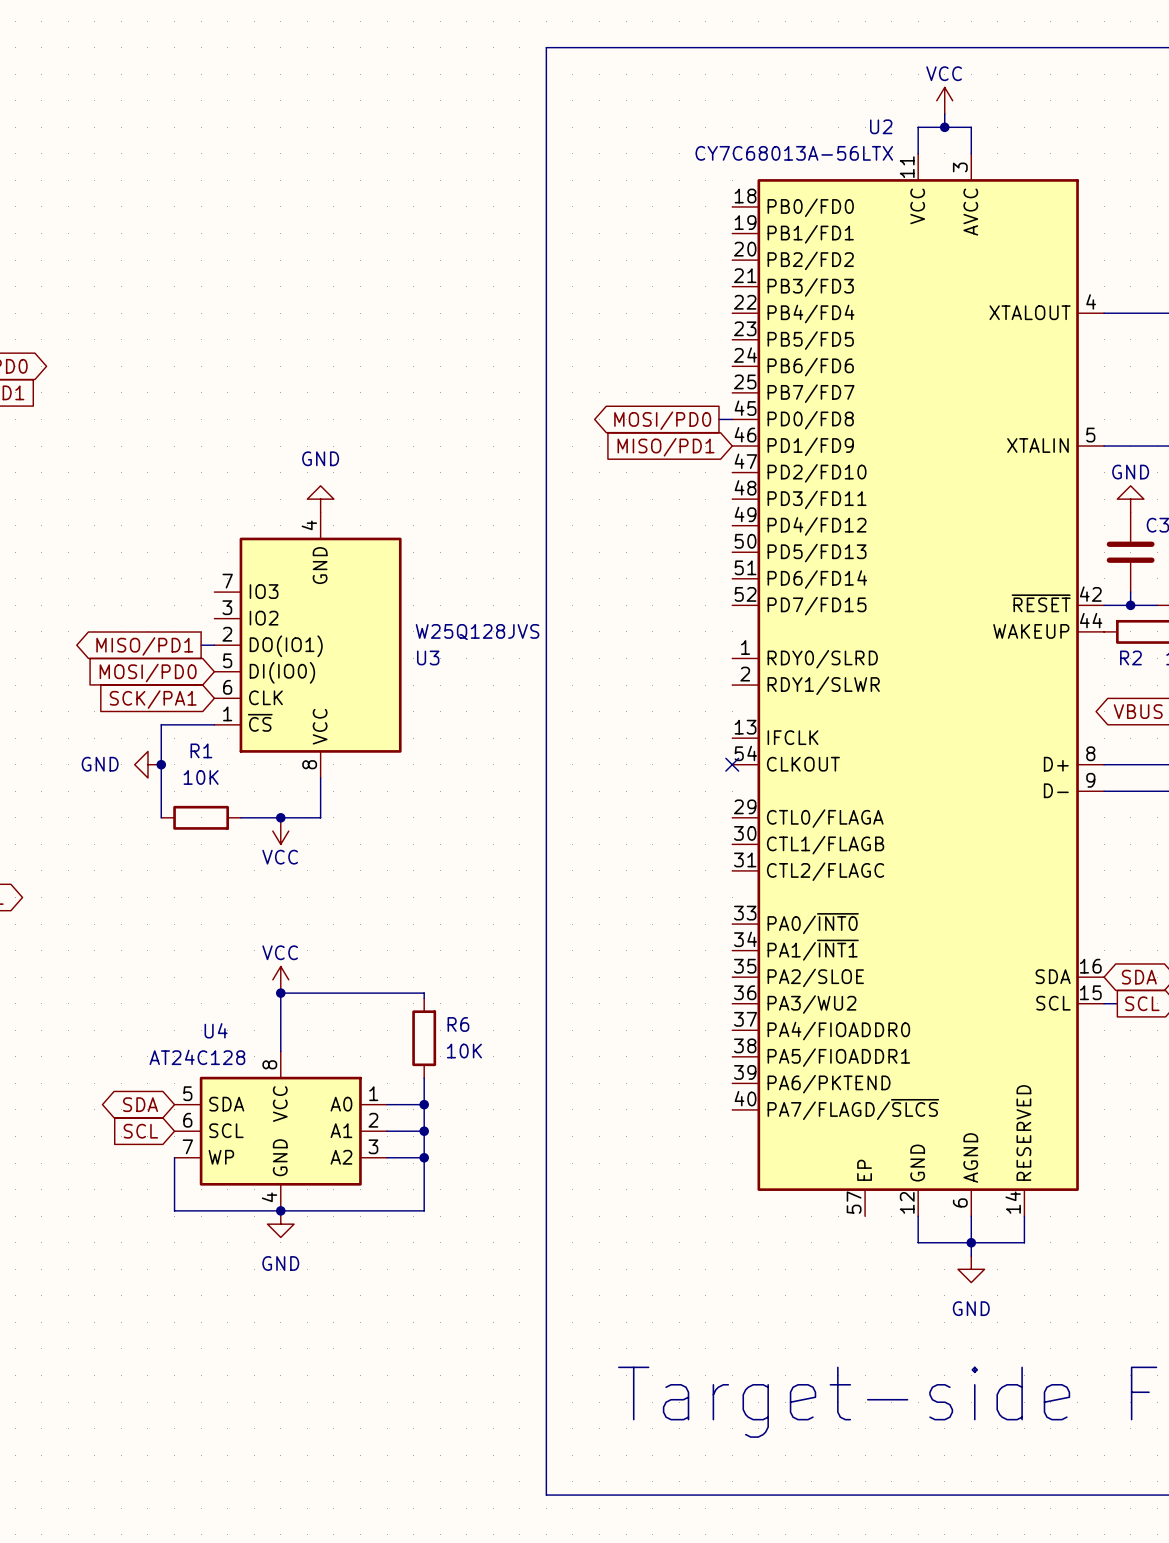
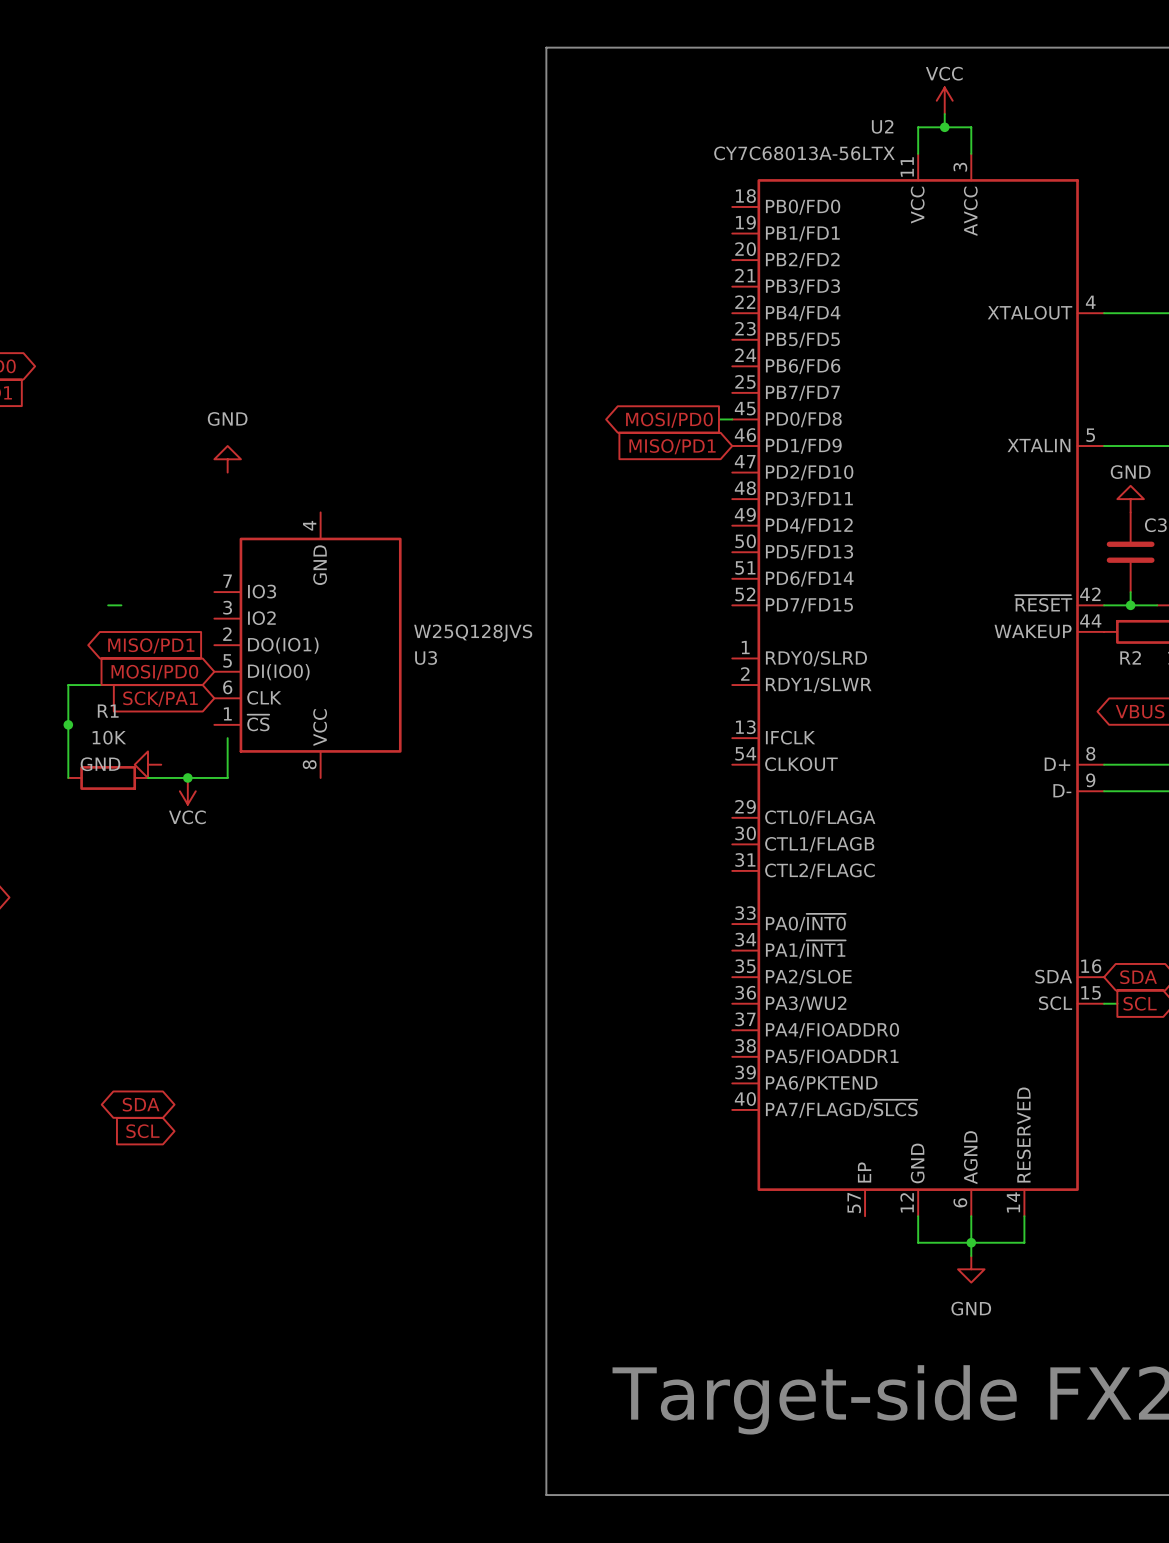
power symbol position: GND (320, 499) -> GND (227, 459)
wire: (201, 645) (214, 645) -> (108, 605) (121, 605)
junction: none -> (68, 724)
wire: (214, 724) (161, 724) (161, 817) -> (121, 685) (68, 685) (68, 777)
junction position: (161, 764) -> (187, 777)
no-connect mark: (732, 764) -> none
wire: (320, 777) (320, 817) (240, 817) -> (227, 738) (227, 777) (147, 777)
R1 position: (201, 817) -> (108, 777)
junction: (280, 817) -> none
power symbol position: VCC (280, 831) -> VCC (187, 791)
power symbol: VCC (280, 979) -> none
junction: (280, 993) -> none
wire: (424, 998) (424, 993) (280, 993) (280, 1051) -> none
R6: 10K (424, 1038) -> none
wire: (424, 1078) (424, 1210) (174, 1210) (174, 1157) -> none
wire: (387, 1104) (424, 1104) -> none
junction: (424, 1104) -> none
U4: AT24C128 (280, 1131) -> none
wire: (387, 1131) (424, 1131) -> none
junction: (424, 1131) -> none
wire: (387, 1157) (424, 1157) -> none
junction: (424, 1157) -> none
junction: (280, 1210) -> none
power symbol: GND (280, 1224) -> none

